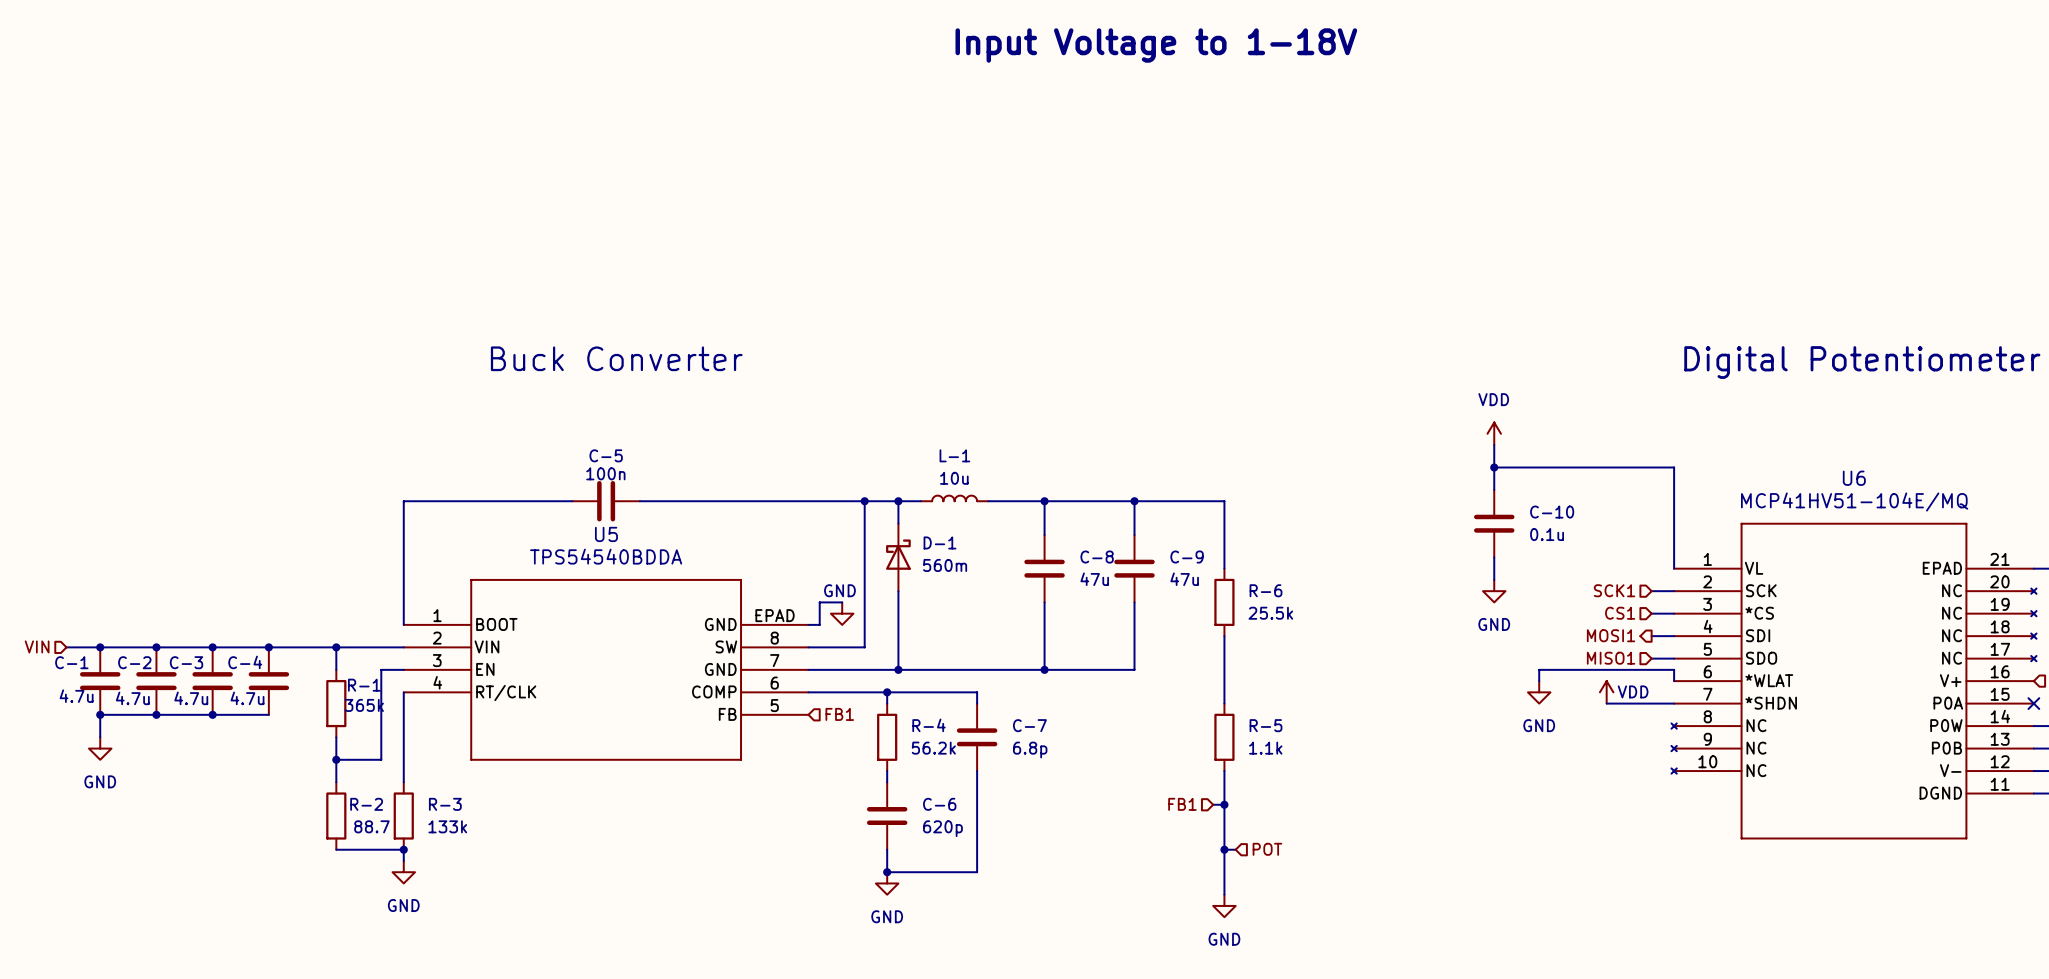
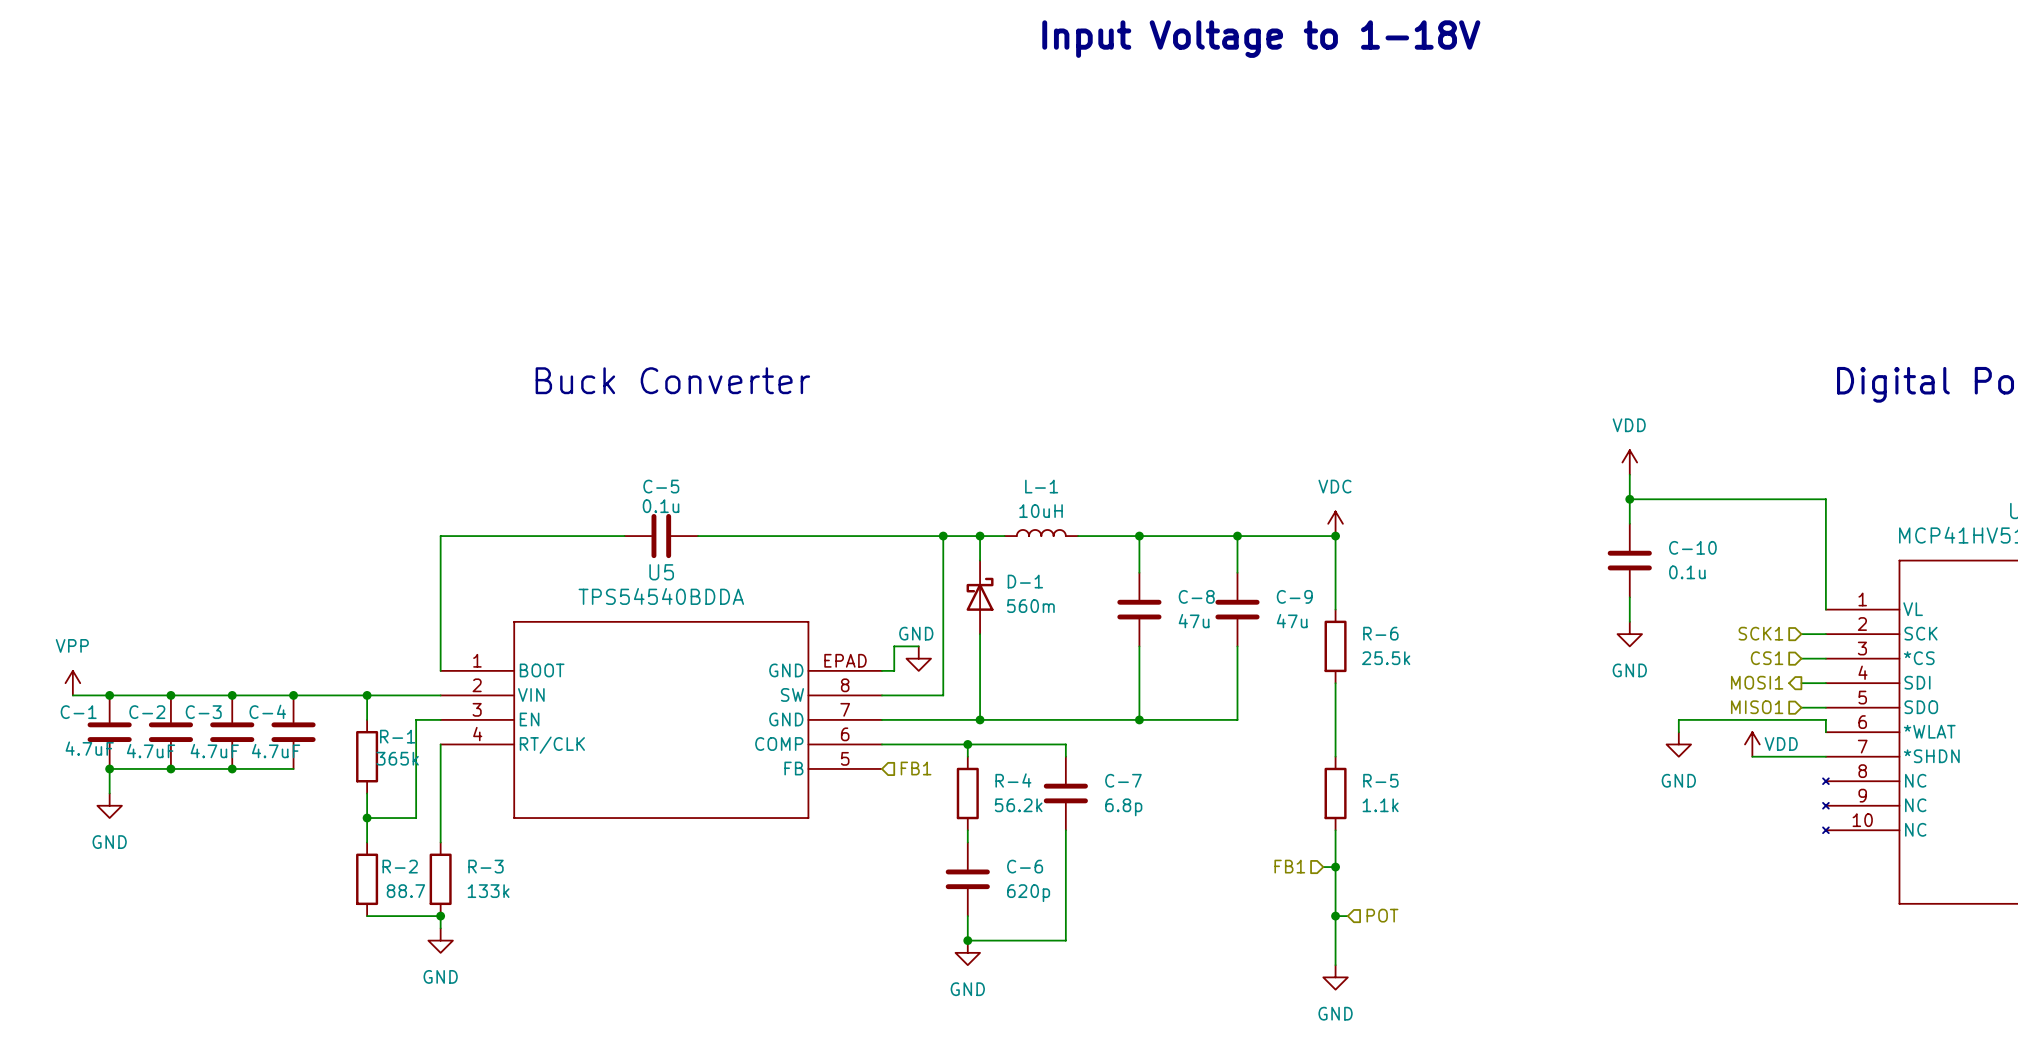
C-5 value: 100n (605, 473) -> 0.1u (661, 506)
L-1 value: 10u (954, 478) -> 10uH (1041, 511)
power symbol: none -> VDC (1335, 523)
junction: none -> (1335, 536)
power symbol: none -> VPP (72, 683)
hierarchical label: VIN (37, 646) -> none
C-1 value: 4.7u (76, 696) -> 4.7uF (89, 748)
C-2 value: 4.7u (132, 698) -> 4.7uF (151, 751)
C-3 value: 4.7u (191, 698) -> 4.7uF (214, 751)
C-4 value: 4.7u (247, 698) -> 4.7uF (276, 751)

